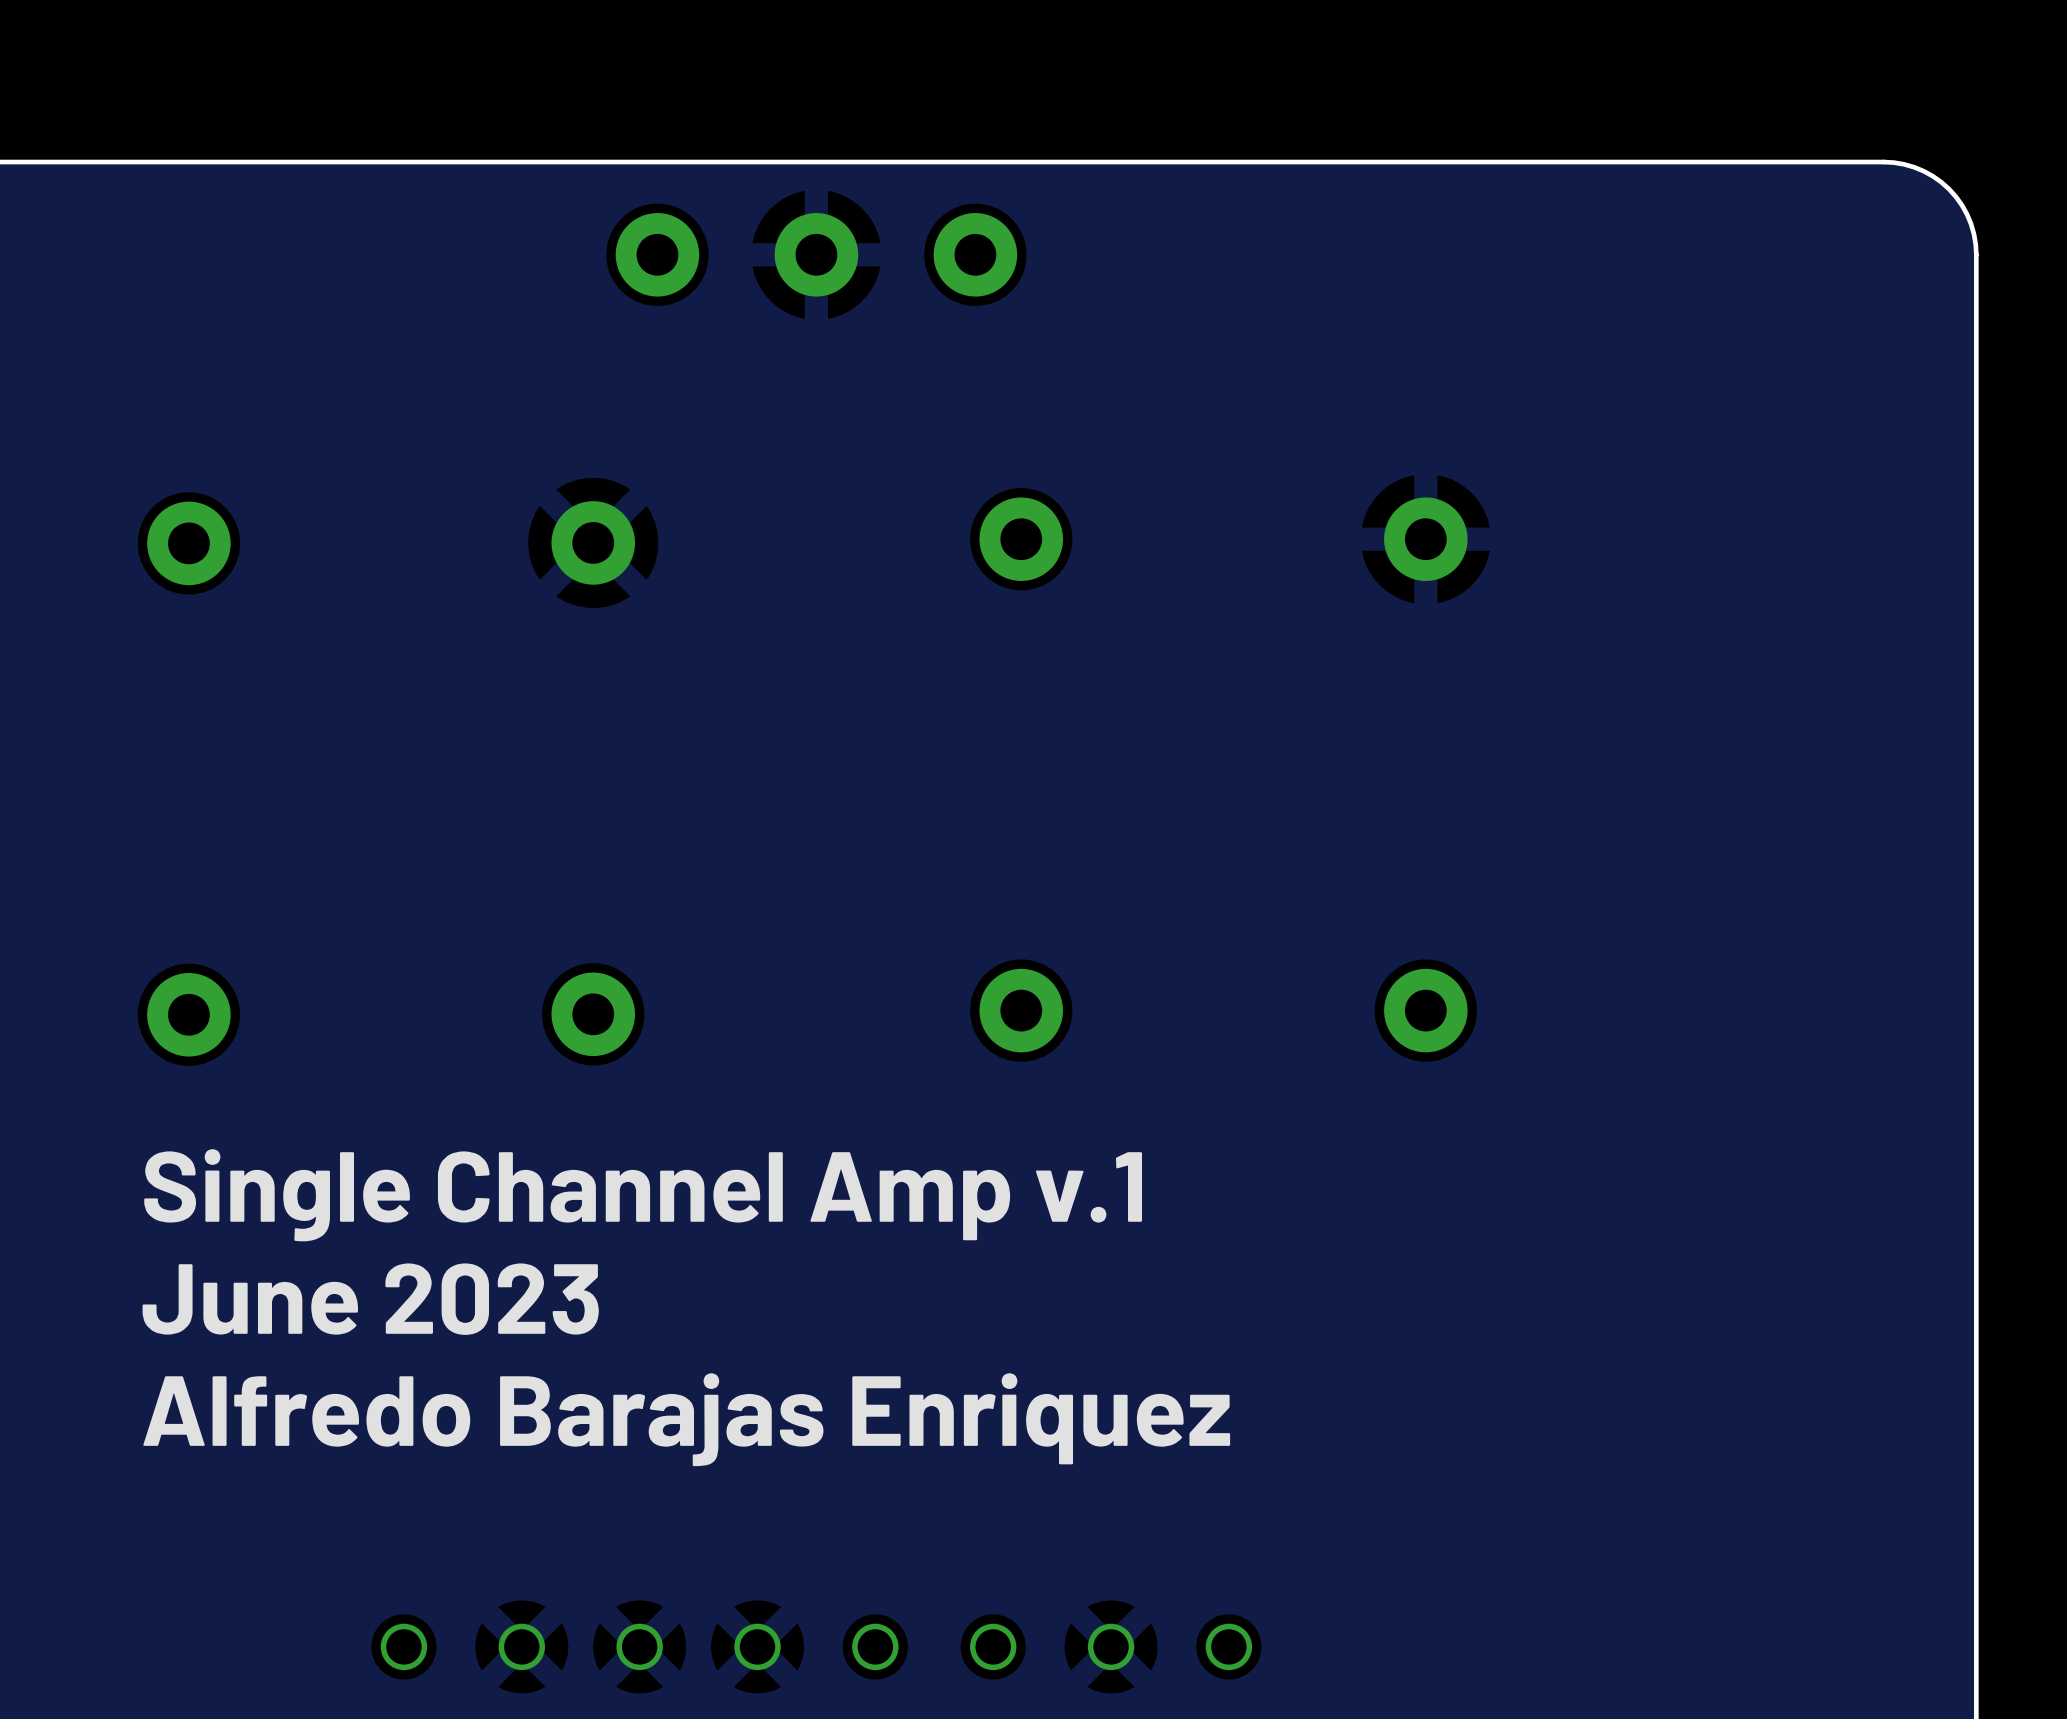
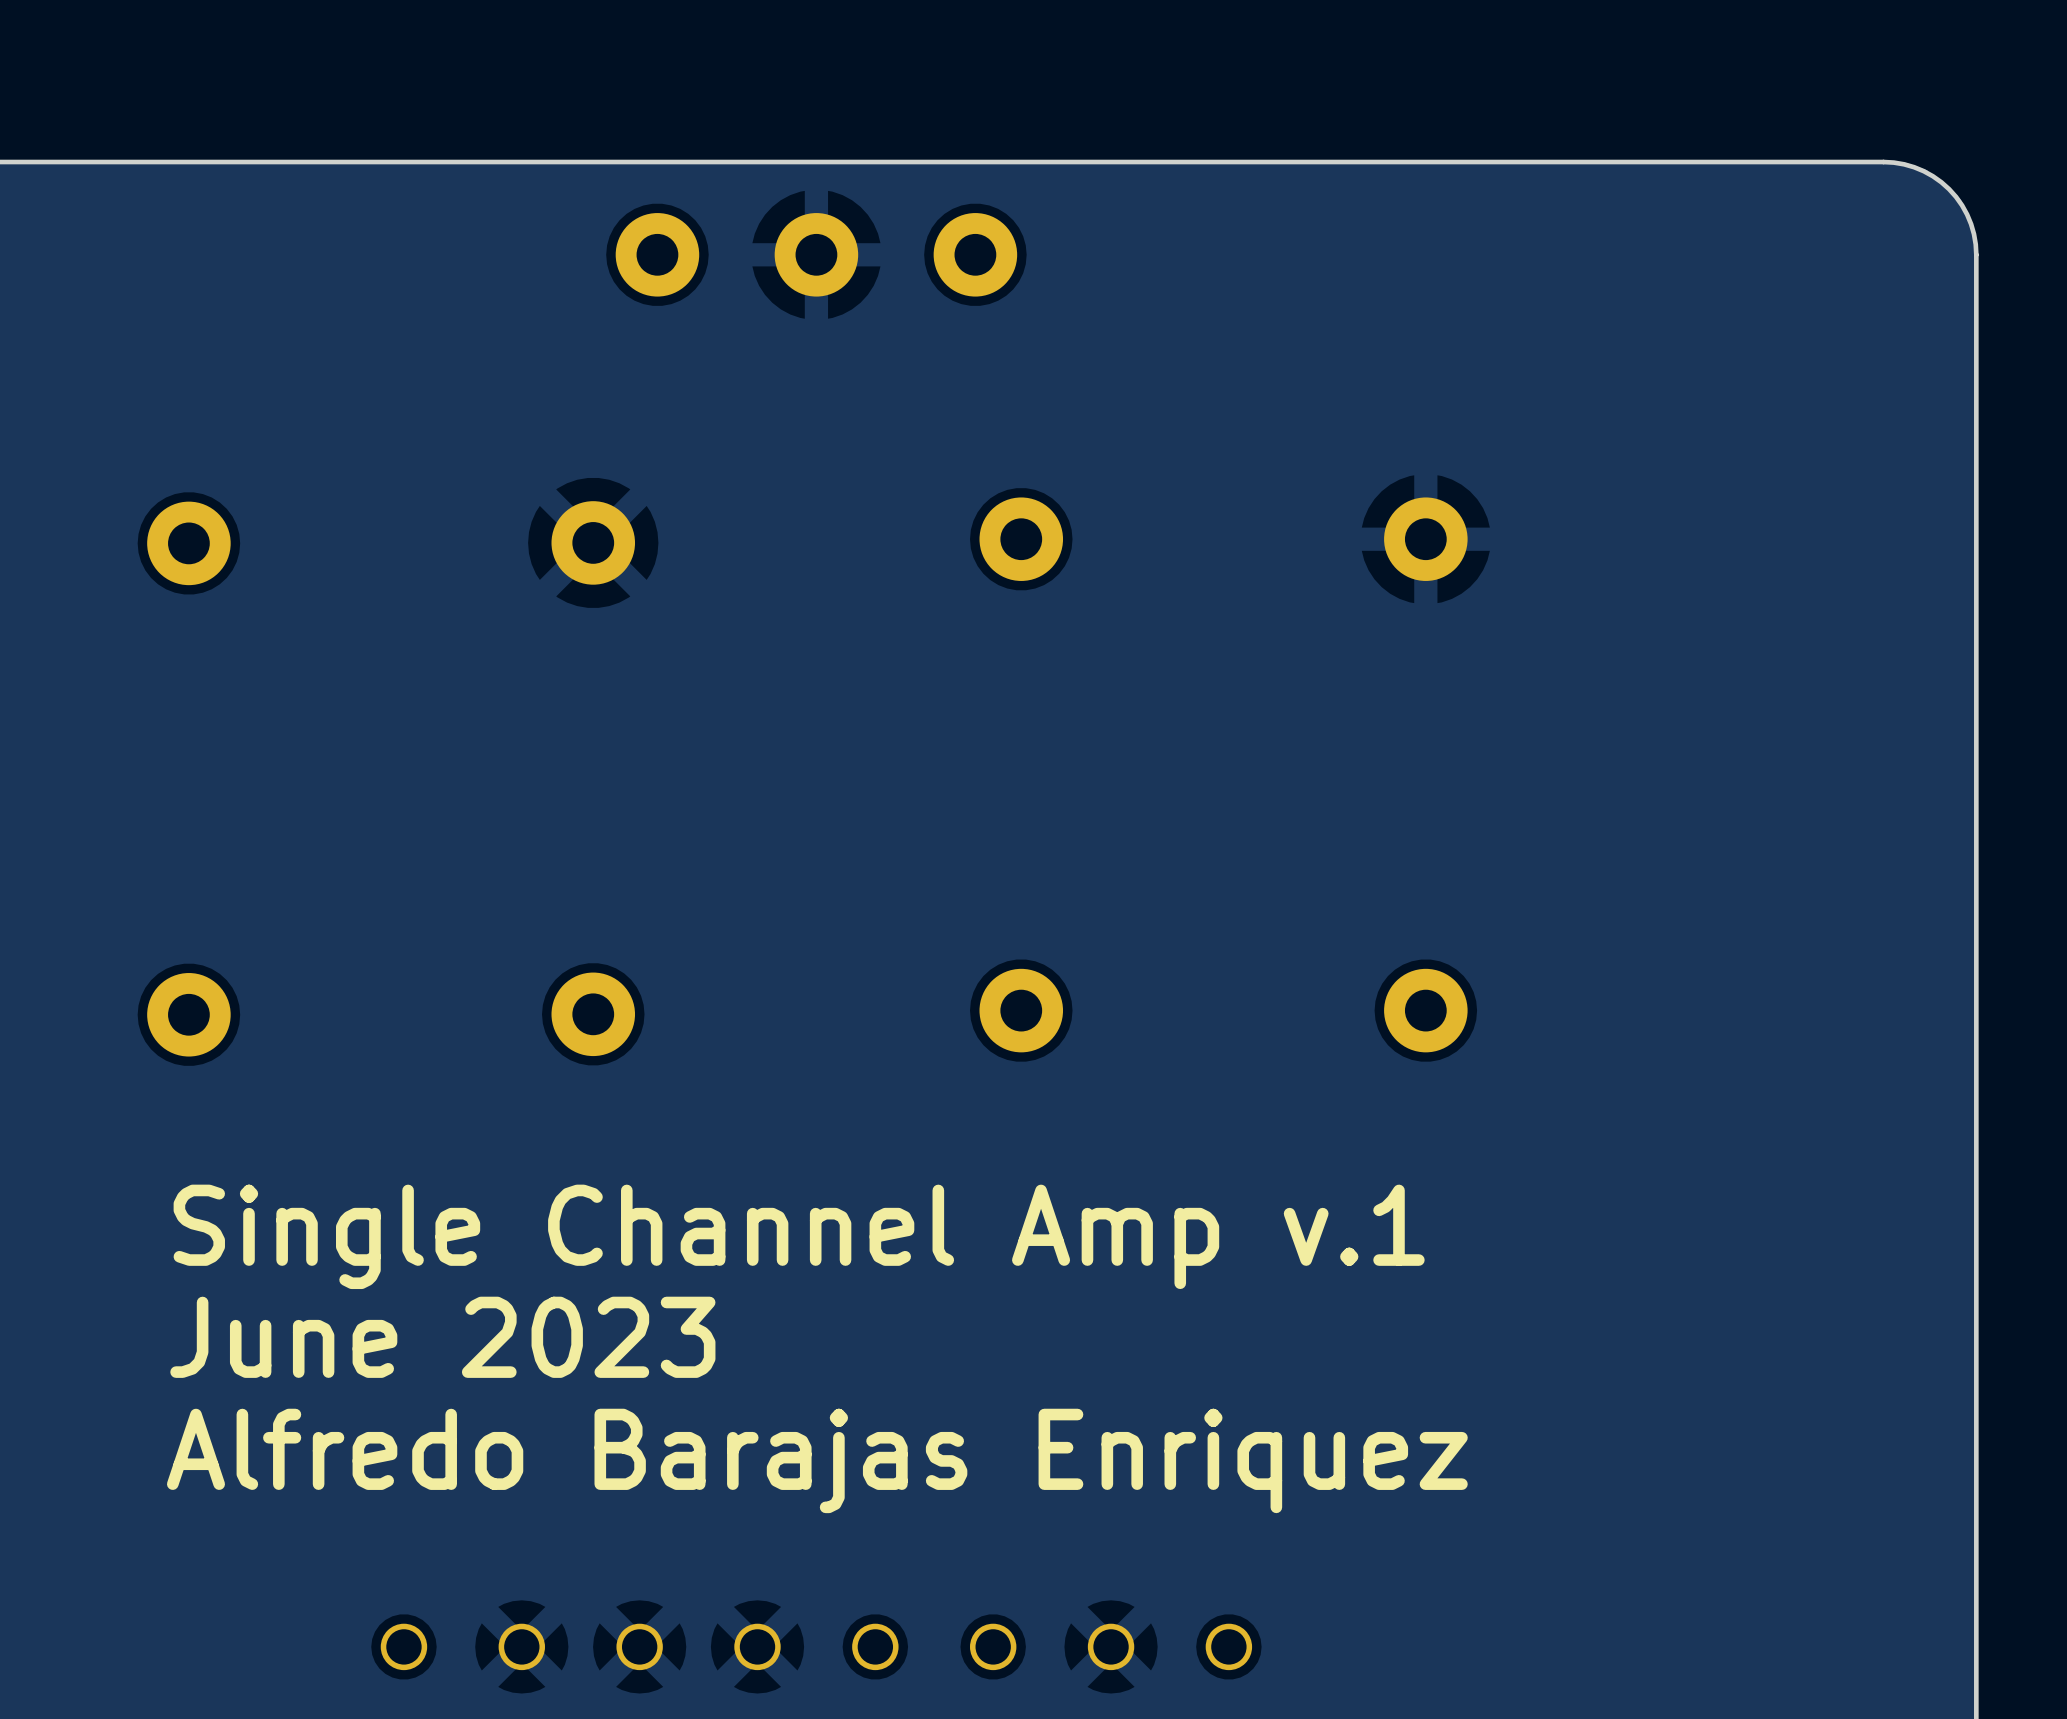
text position: Single Channel Amp v.1 (643, 1195) -> Single Channel Amp v.1 (799, 1236)
text position: June 2023 (370, 1299) -> June 2023 (442, 1337)
text position: Alfredo Barajas Enriquez (686, 1419) -> Alfredo Barajas Enriquez (817, 1460)

